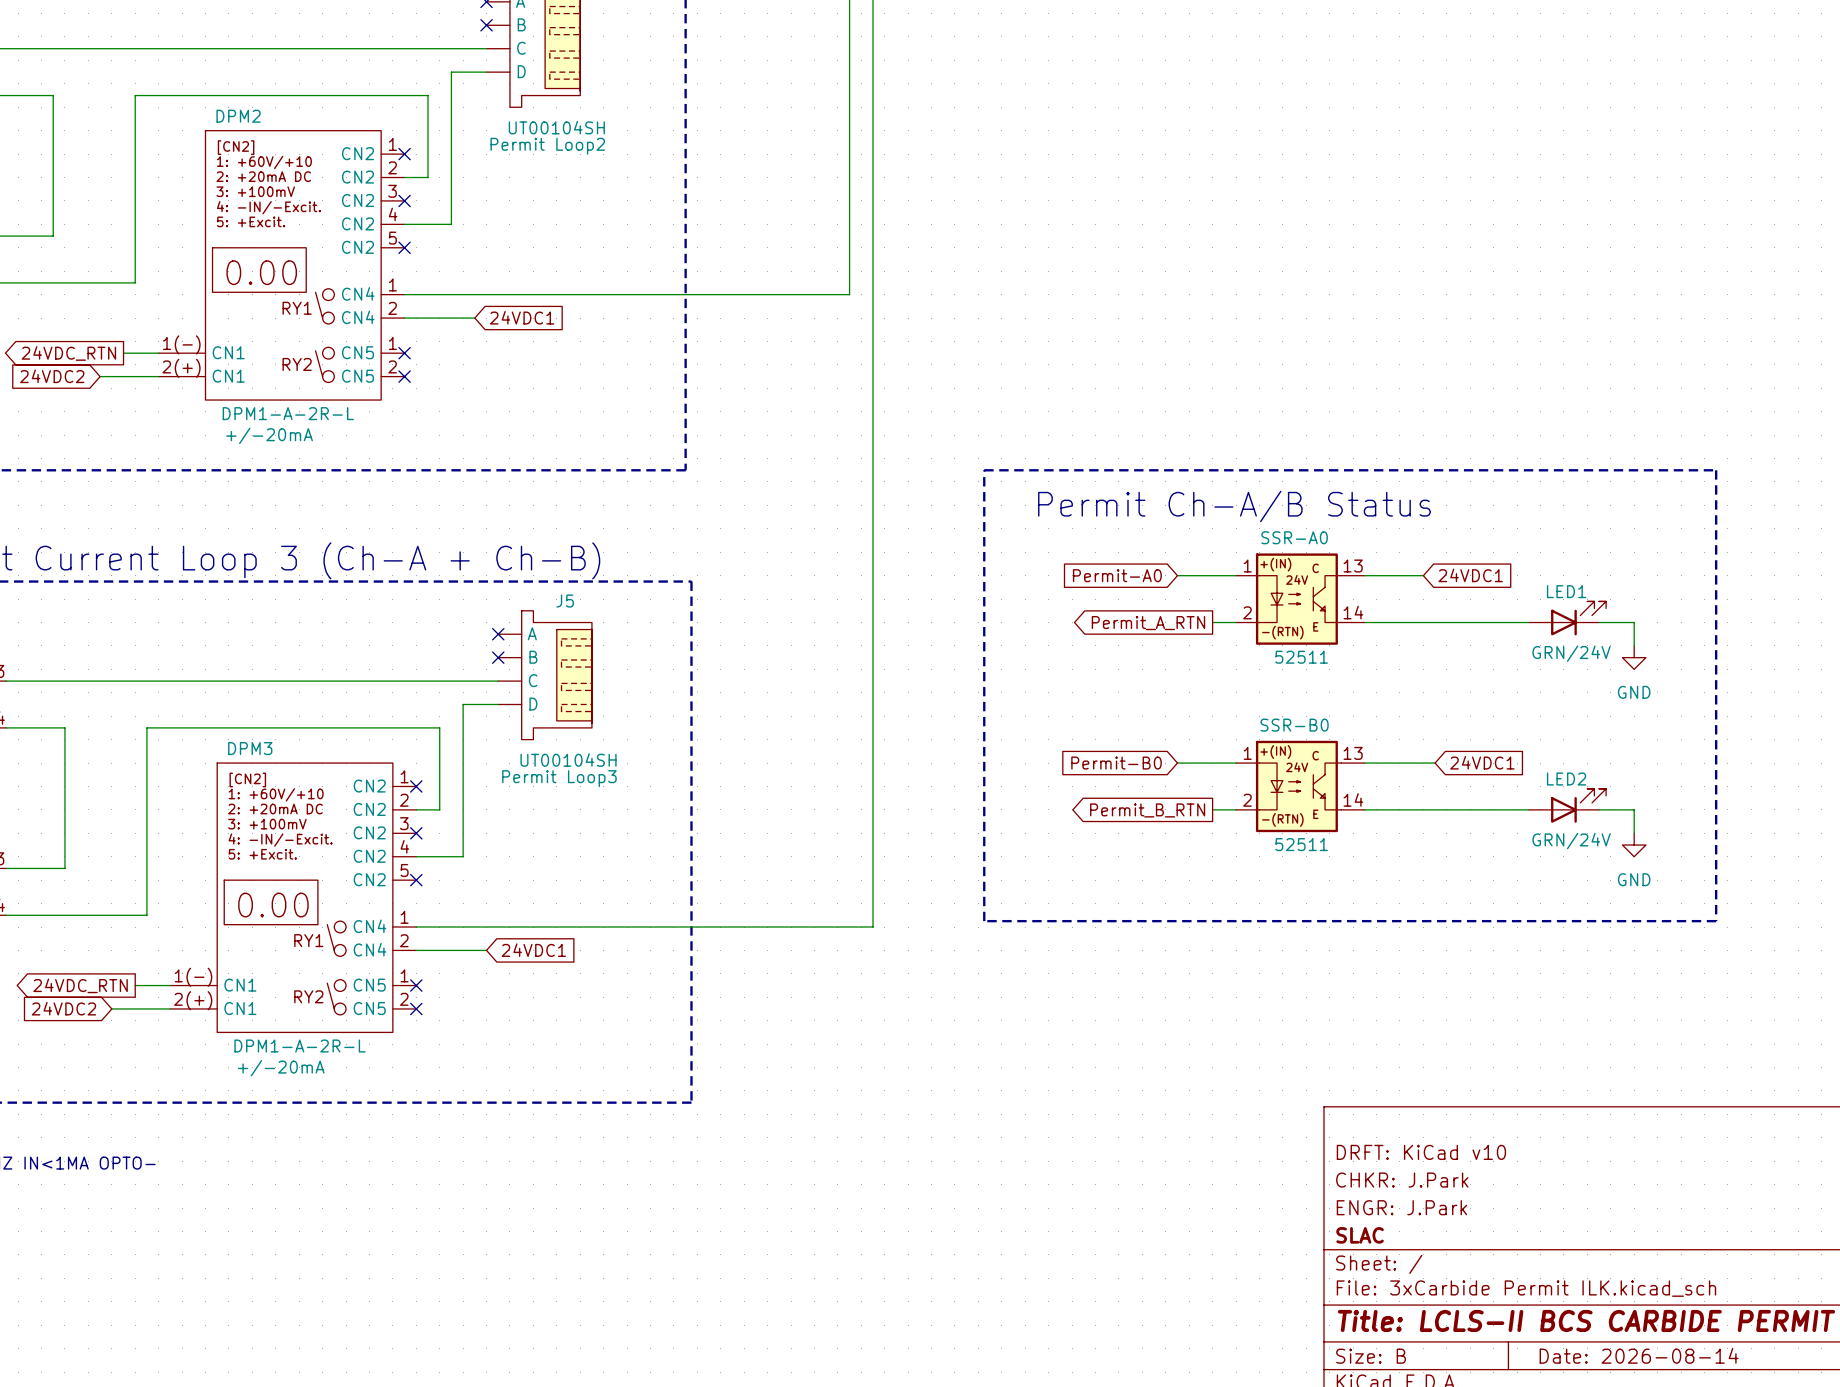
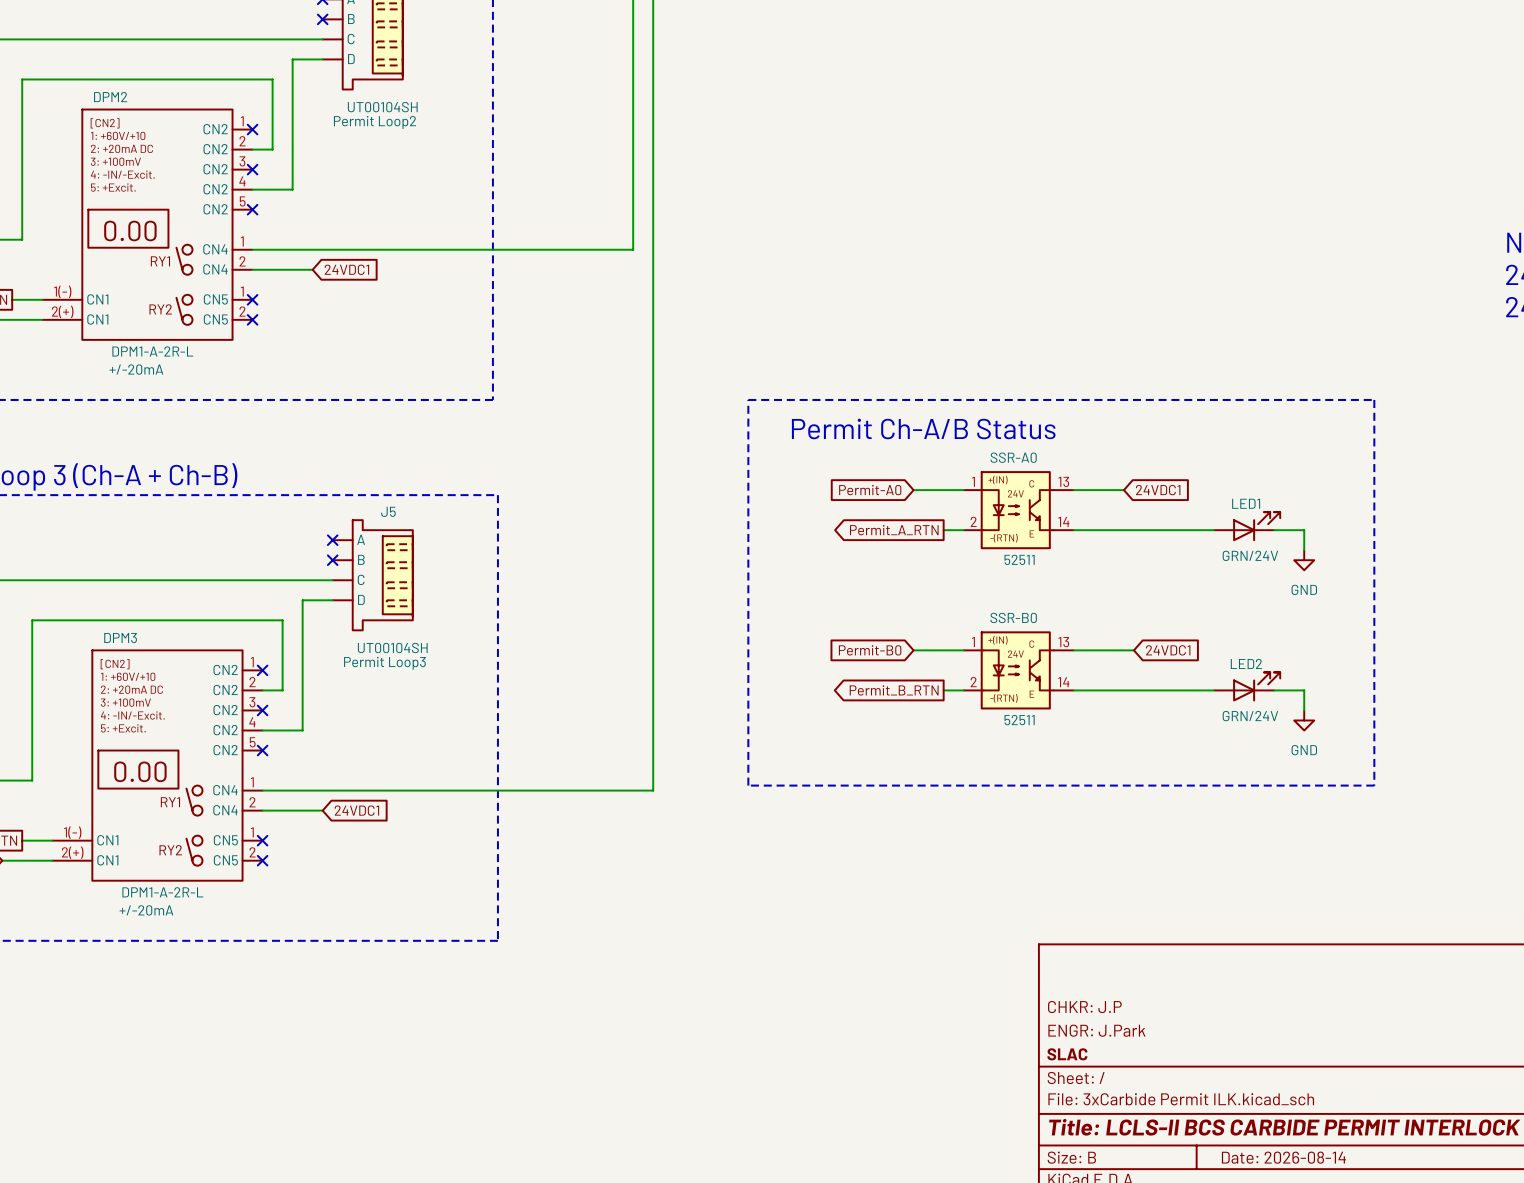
title block: DRFT: KiCad v10 (1421, 1152) -> none
title block: CHKR: J.Park (1402, 1180) -> CHKR: J.P (1084, 1007)

